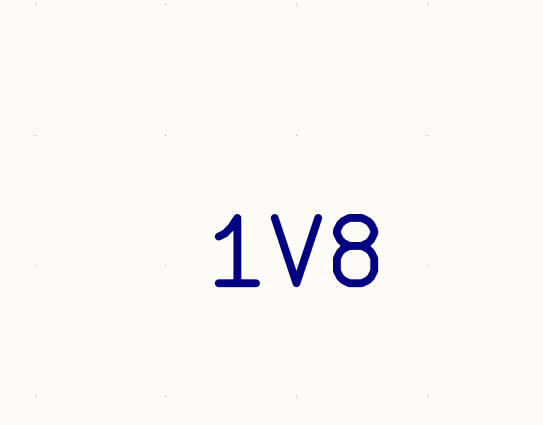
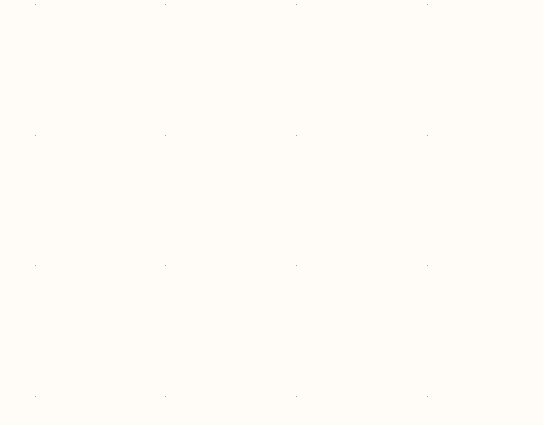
text: 1V8 (296, 250) -> none

